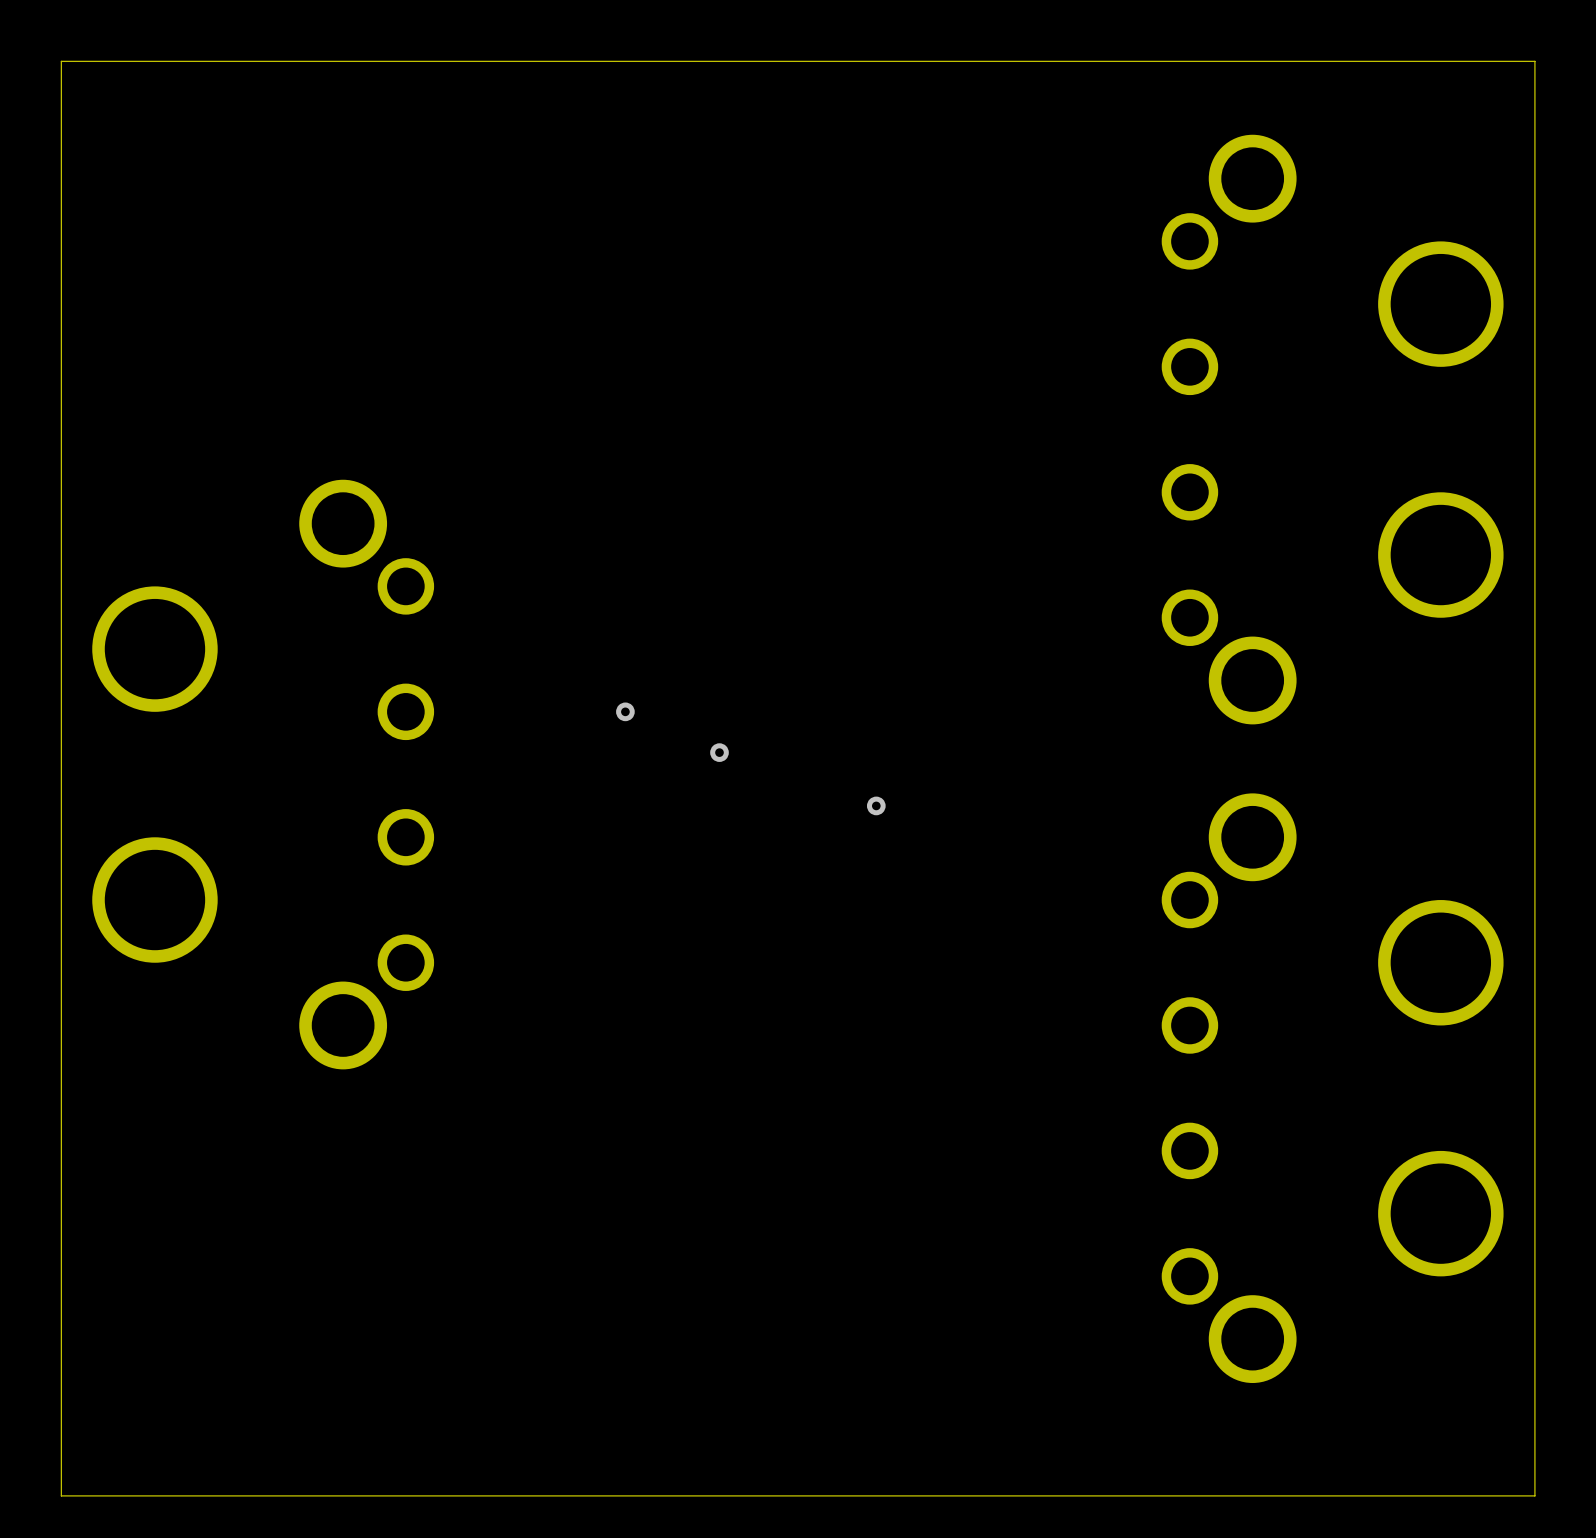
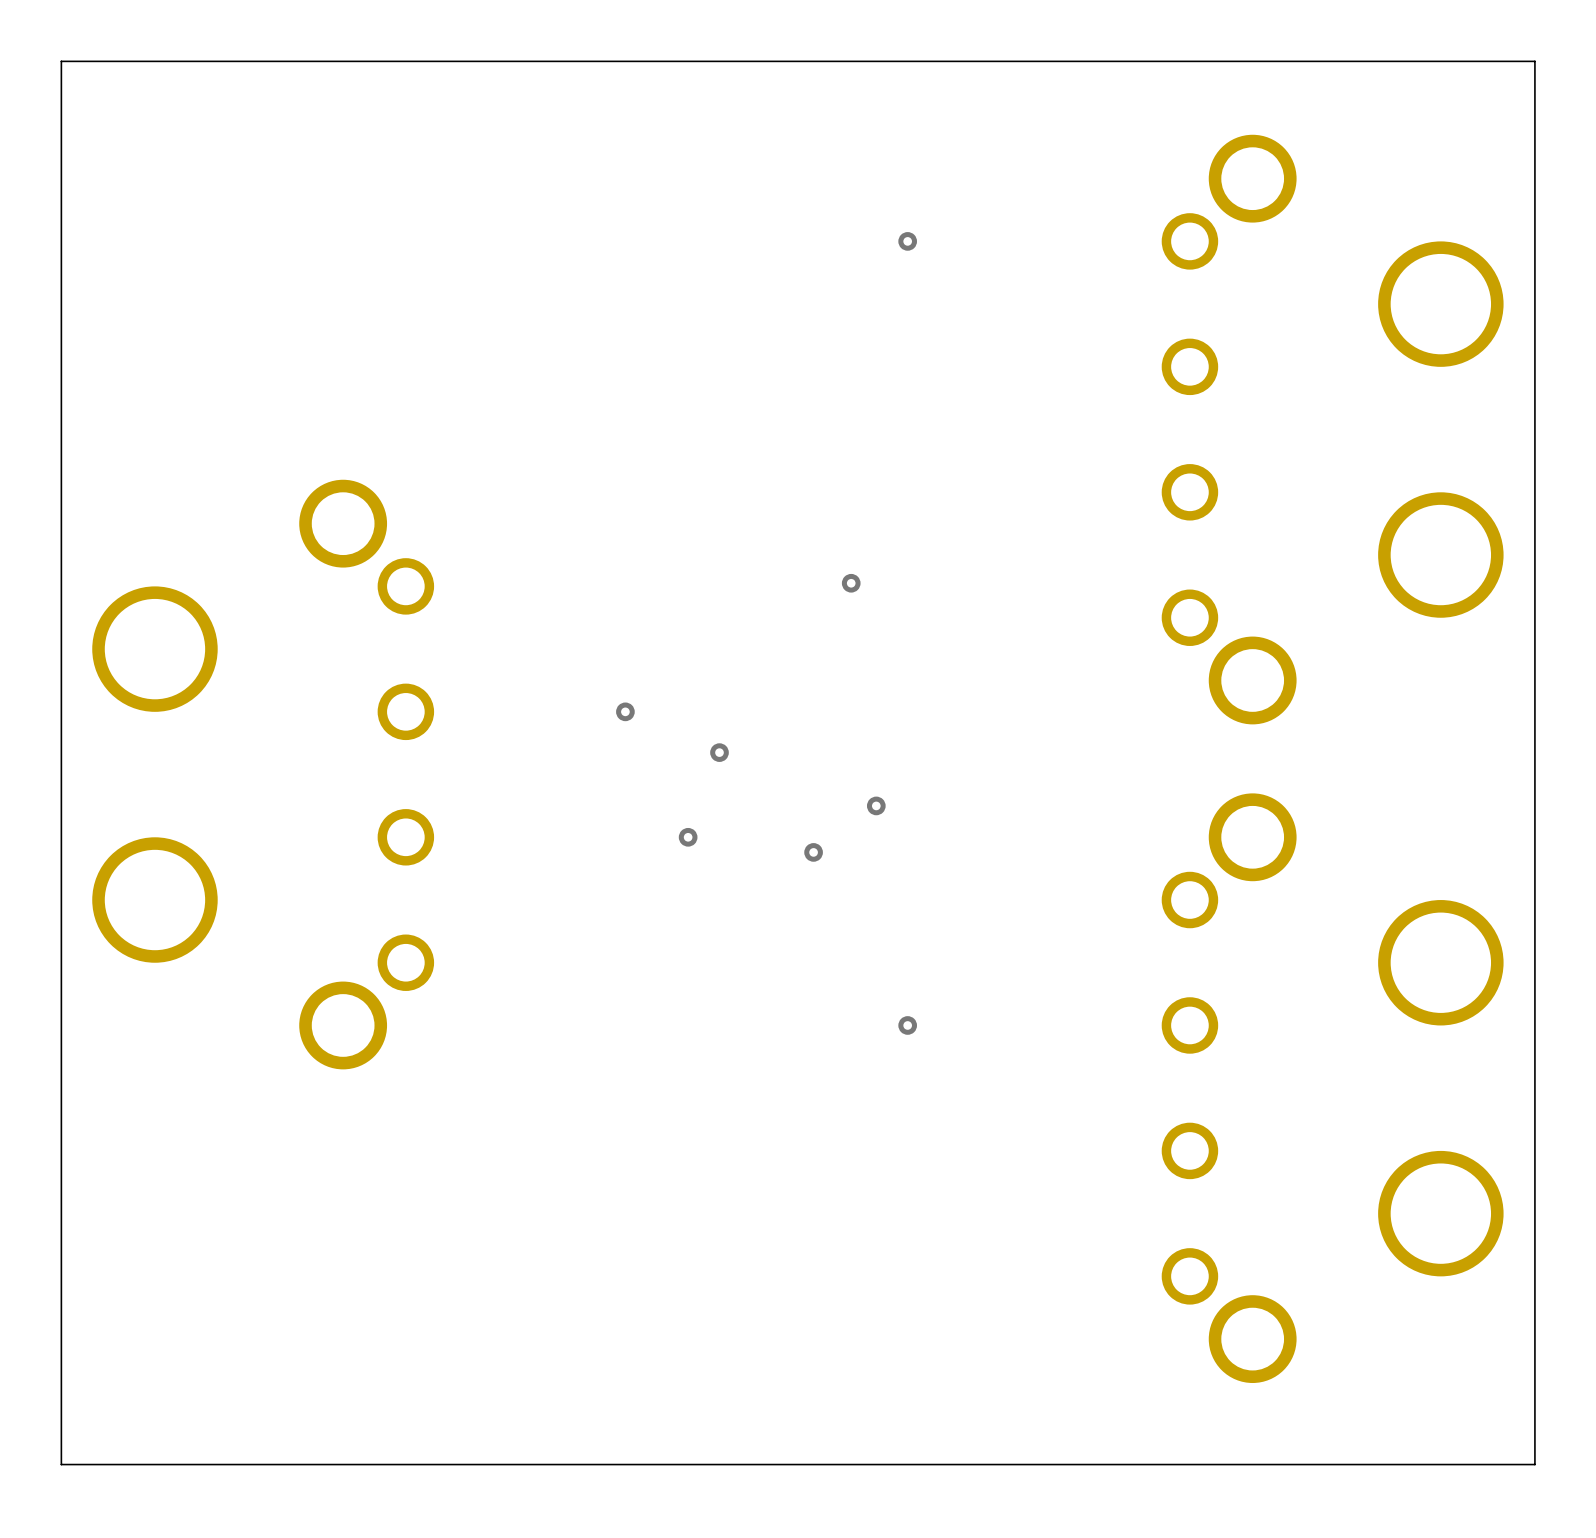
via: none -> (907, 241)
via: none -> (851, 583)
via: none -> (688, 837)
via: none -> (813, 852)
via: none -> (907, 1025)
board edge: (1534, 1464) (1534, 1495) (61, 1495) (61, 1464) -> (1534, 1464) (61, 1464)

